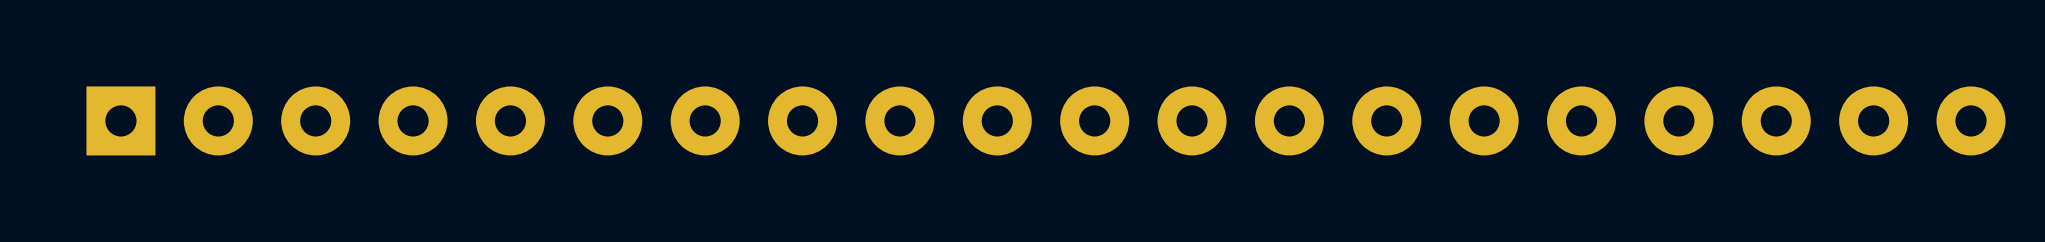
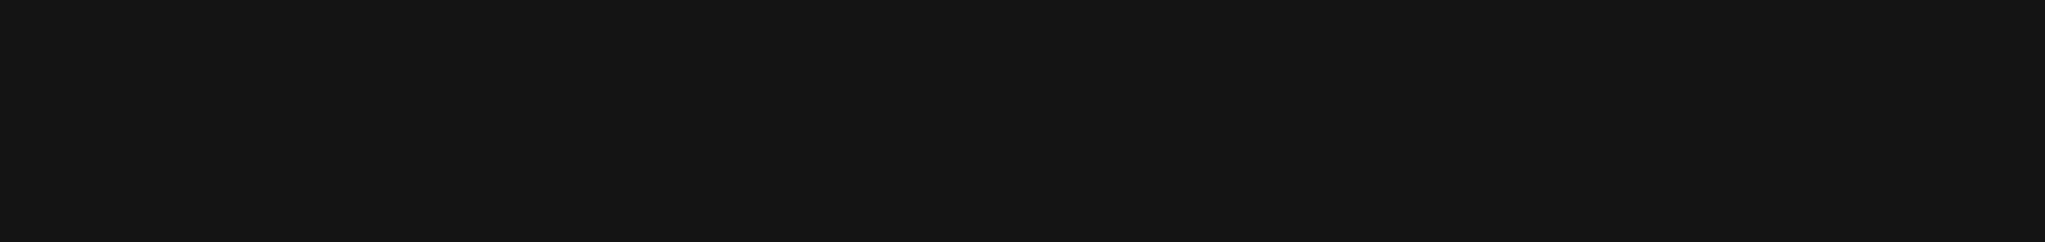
part: (1045, 120) -> none

